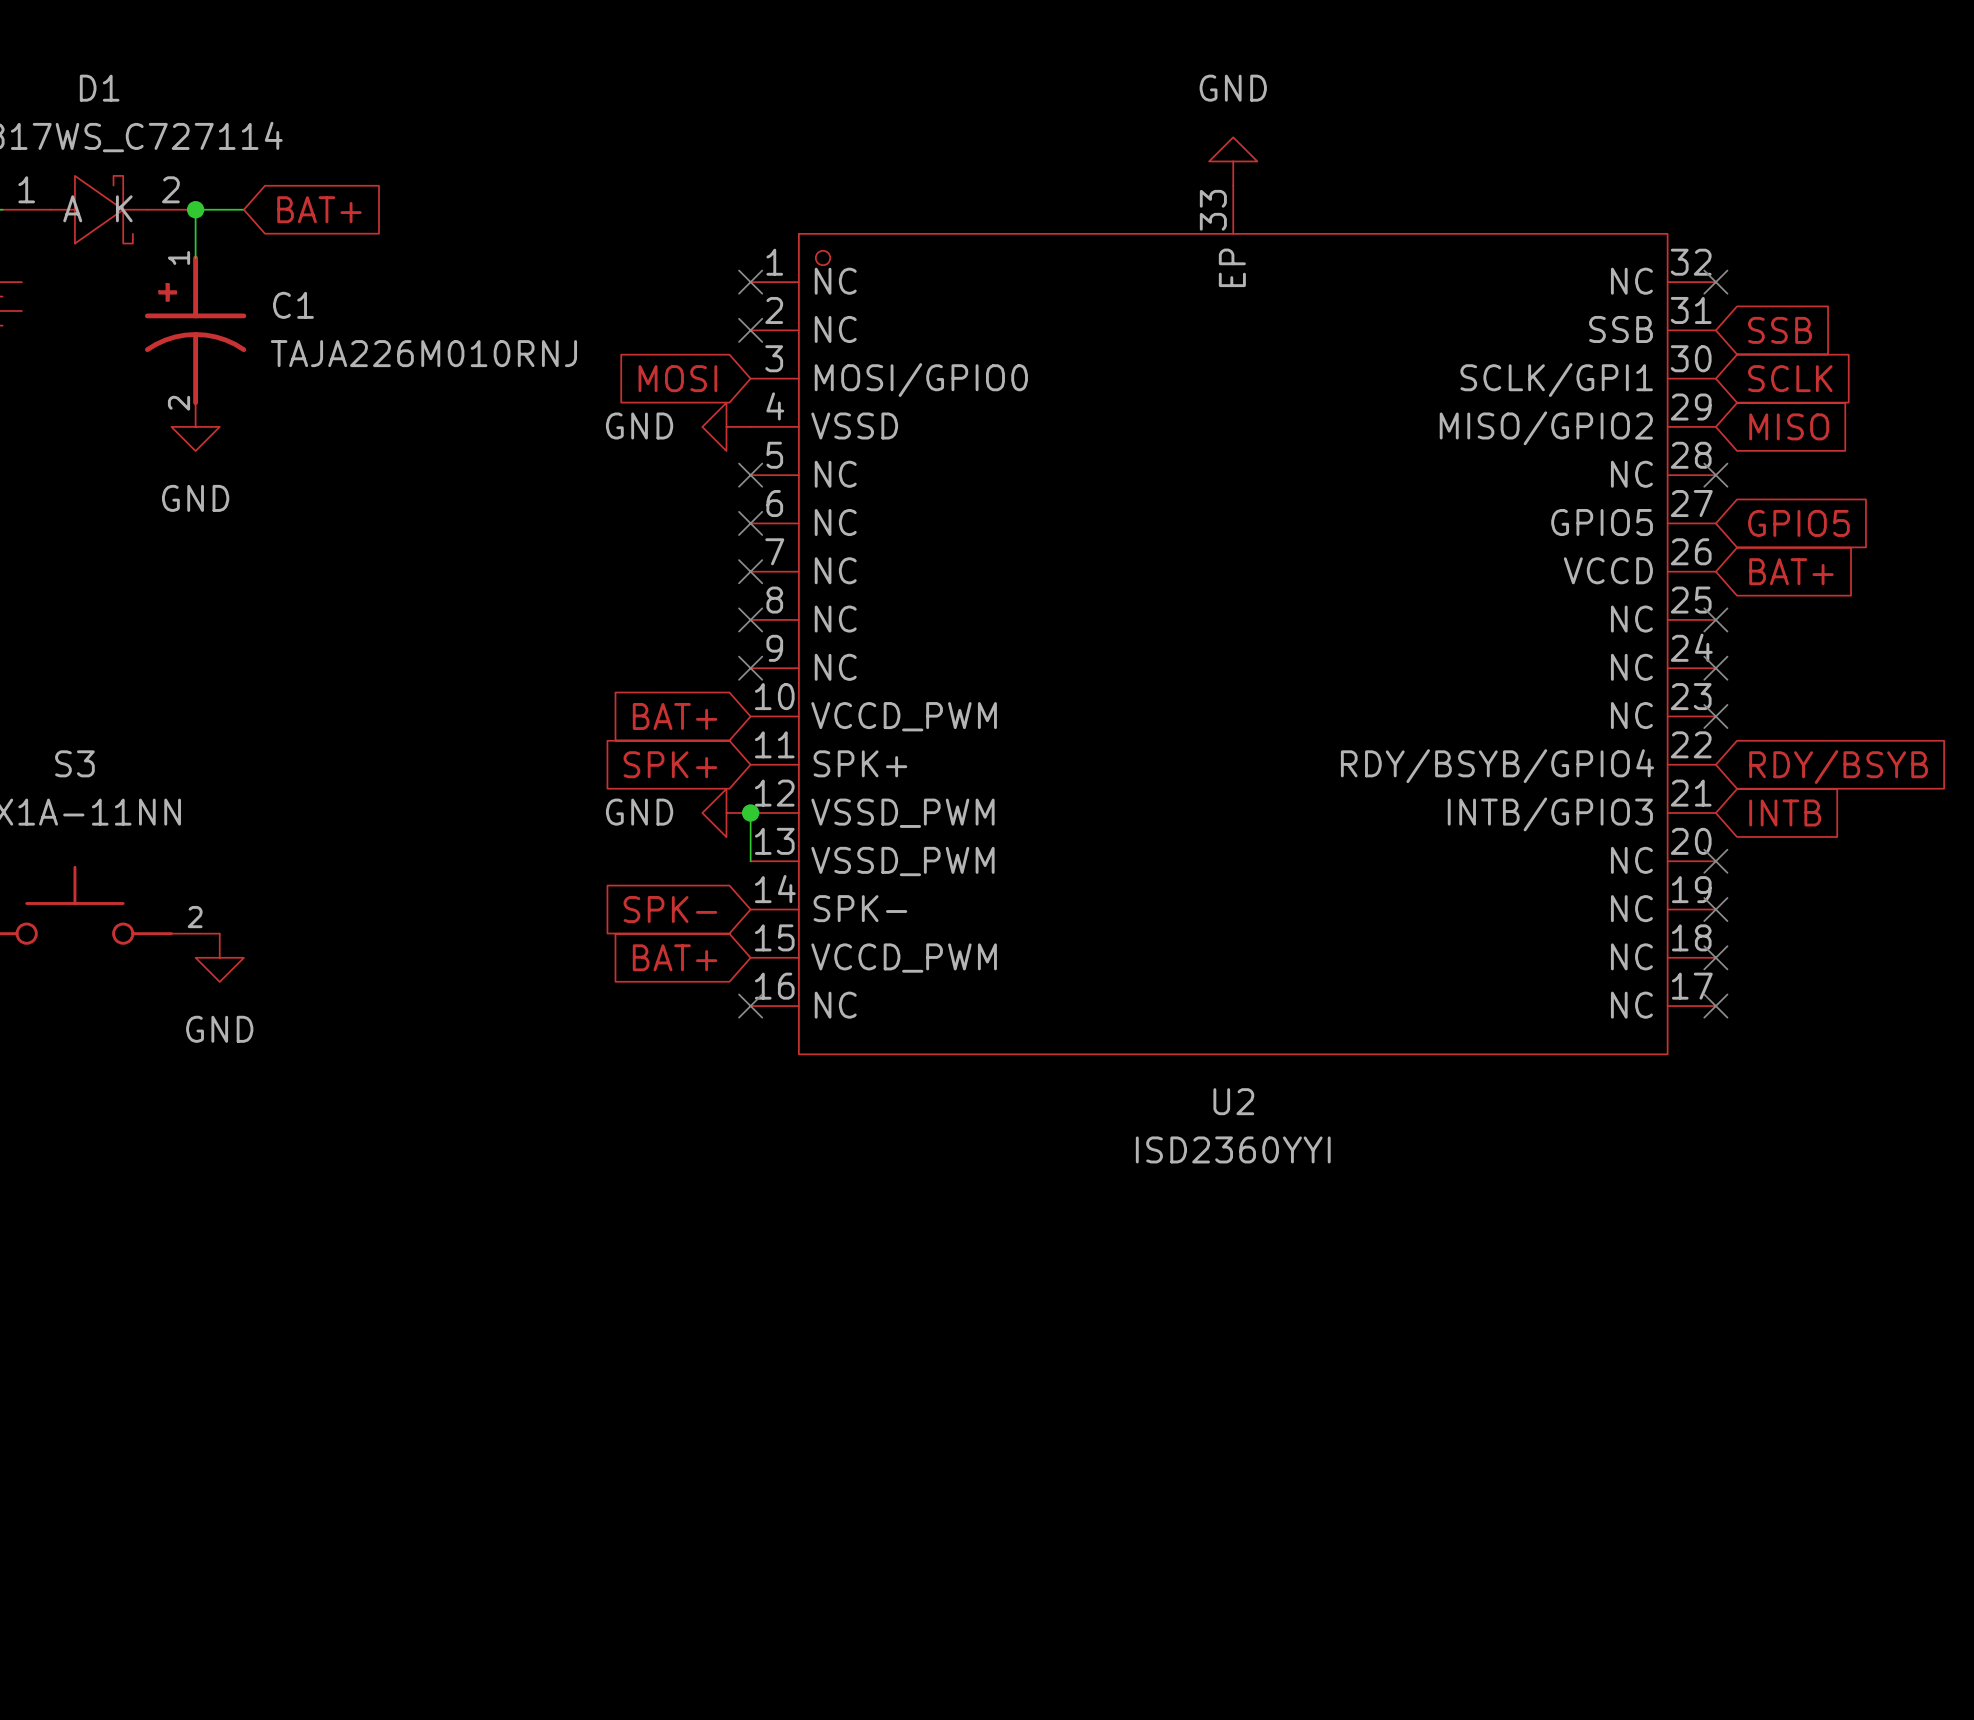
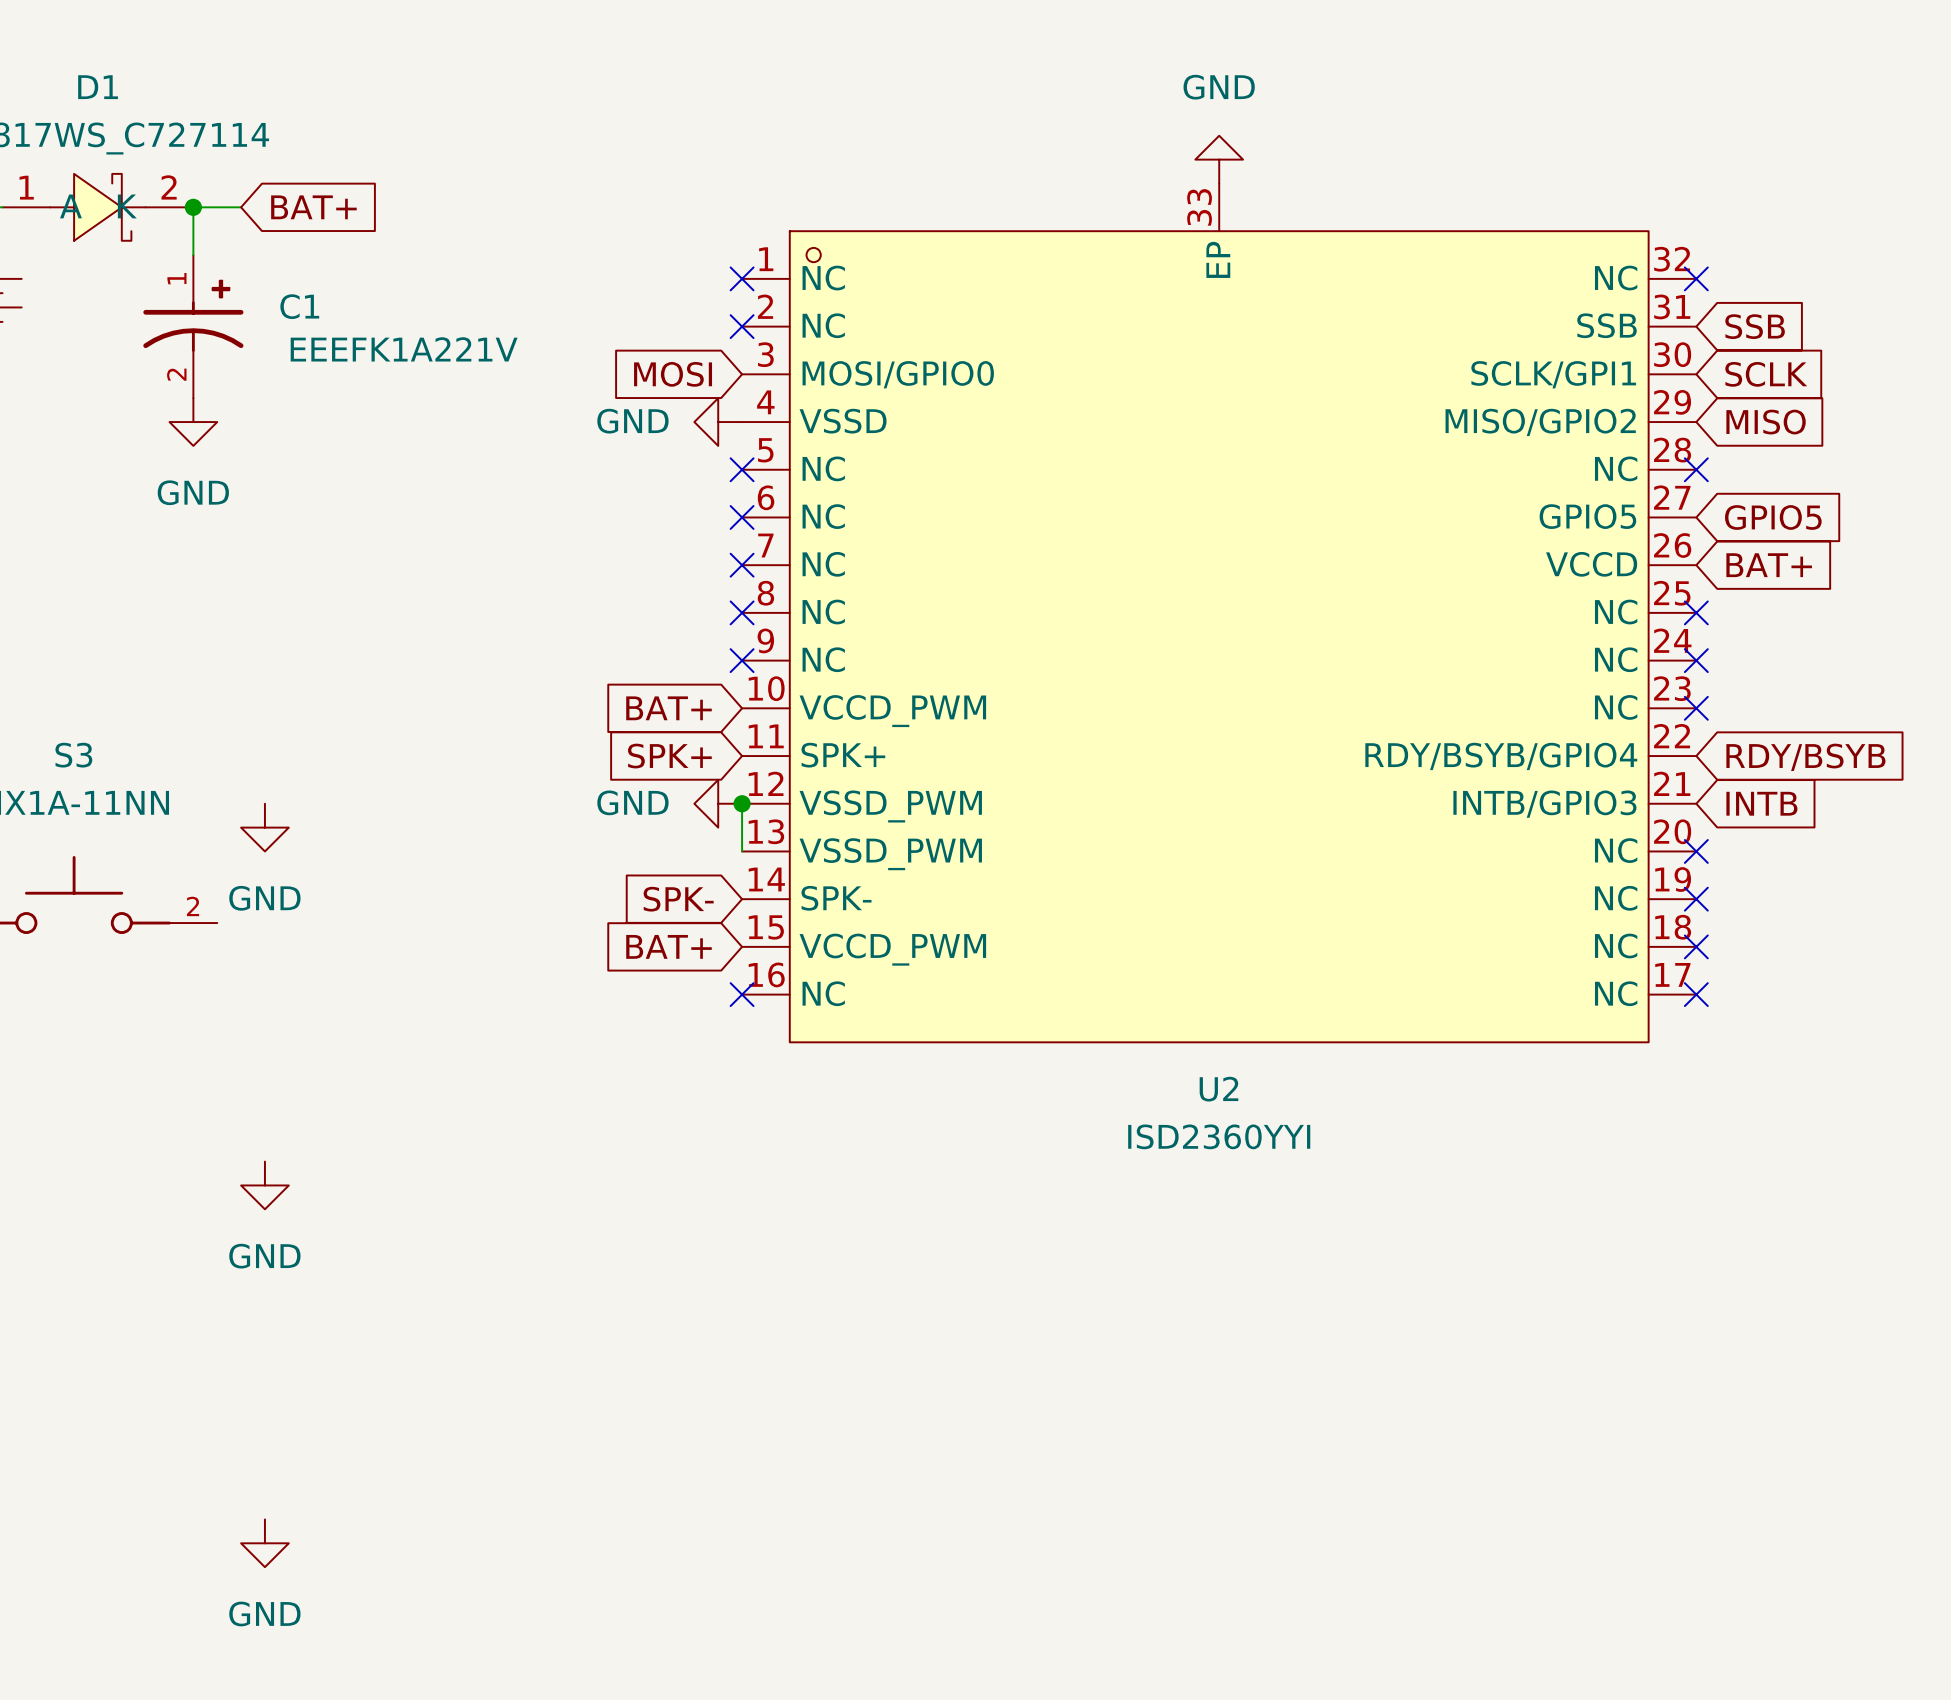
C1 symbol: [144, 255, 247, 406] -> [143, 255, 244, 399]
C1 value: TAJA226M010RNJ (423, 353) -> EEEFK1A221V (404, 349)
power symbol: none -> GND (264, 827)
power symbol: GND (219, 957) -> none
power symbol: none -> GND (264, 1185)
power symbol: none -> GND (264, 1543)

